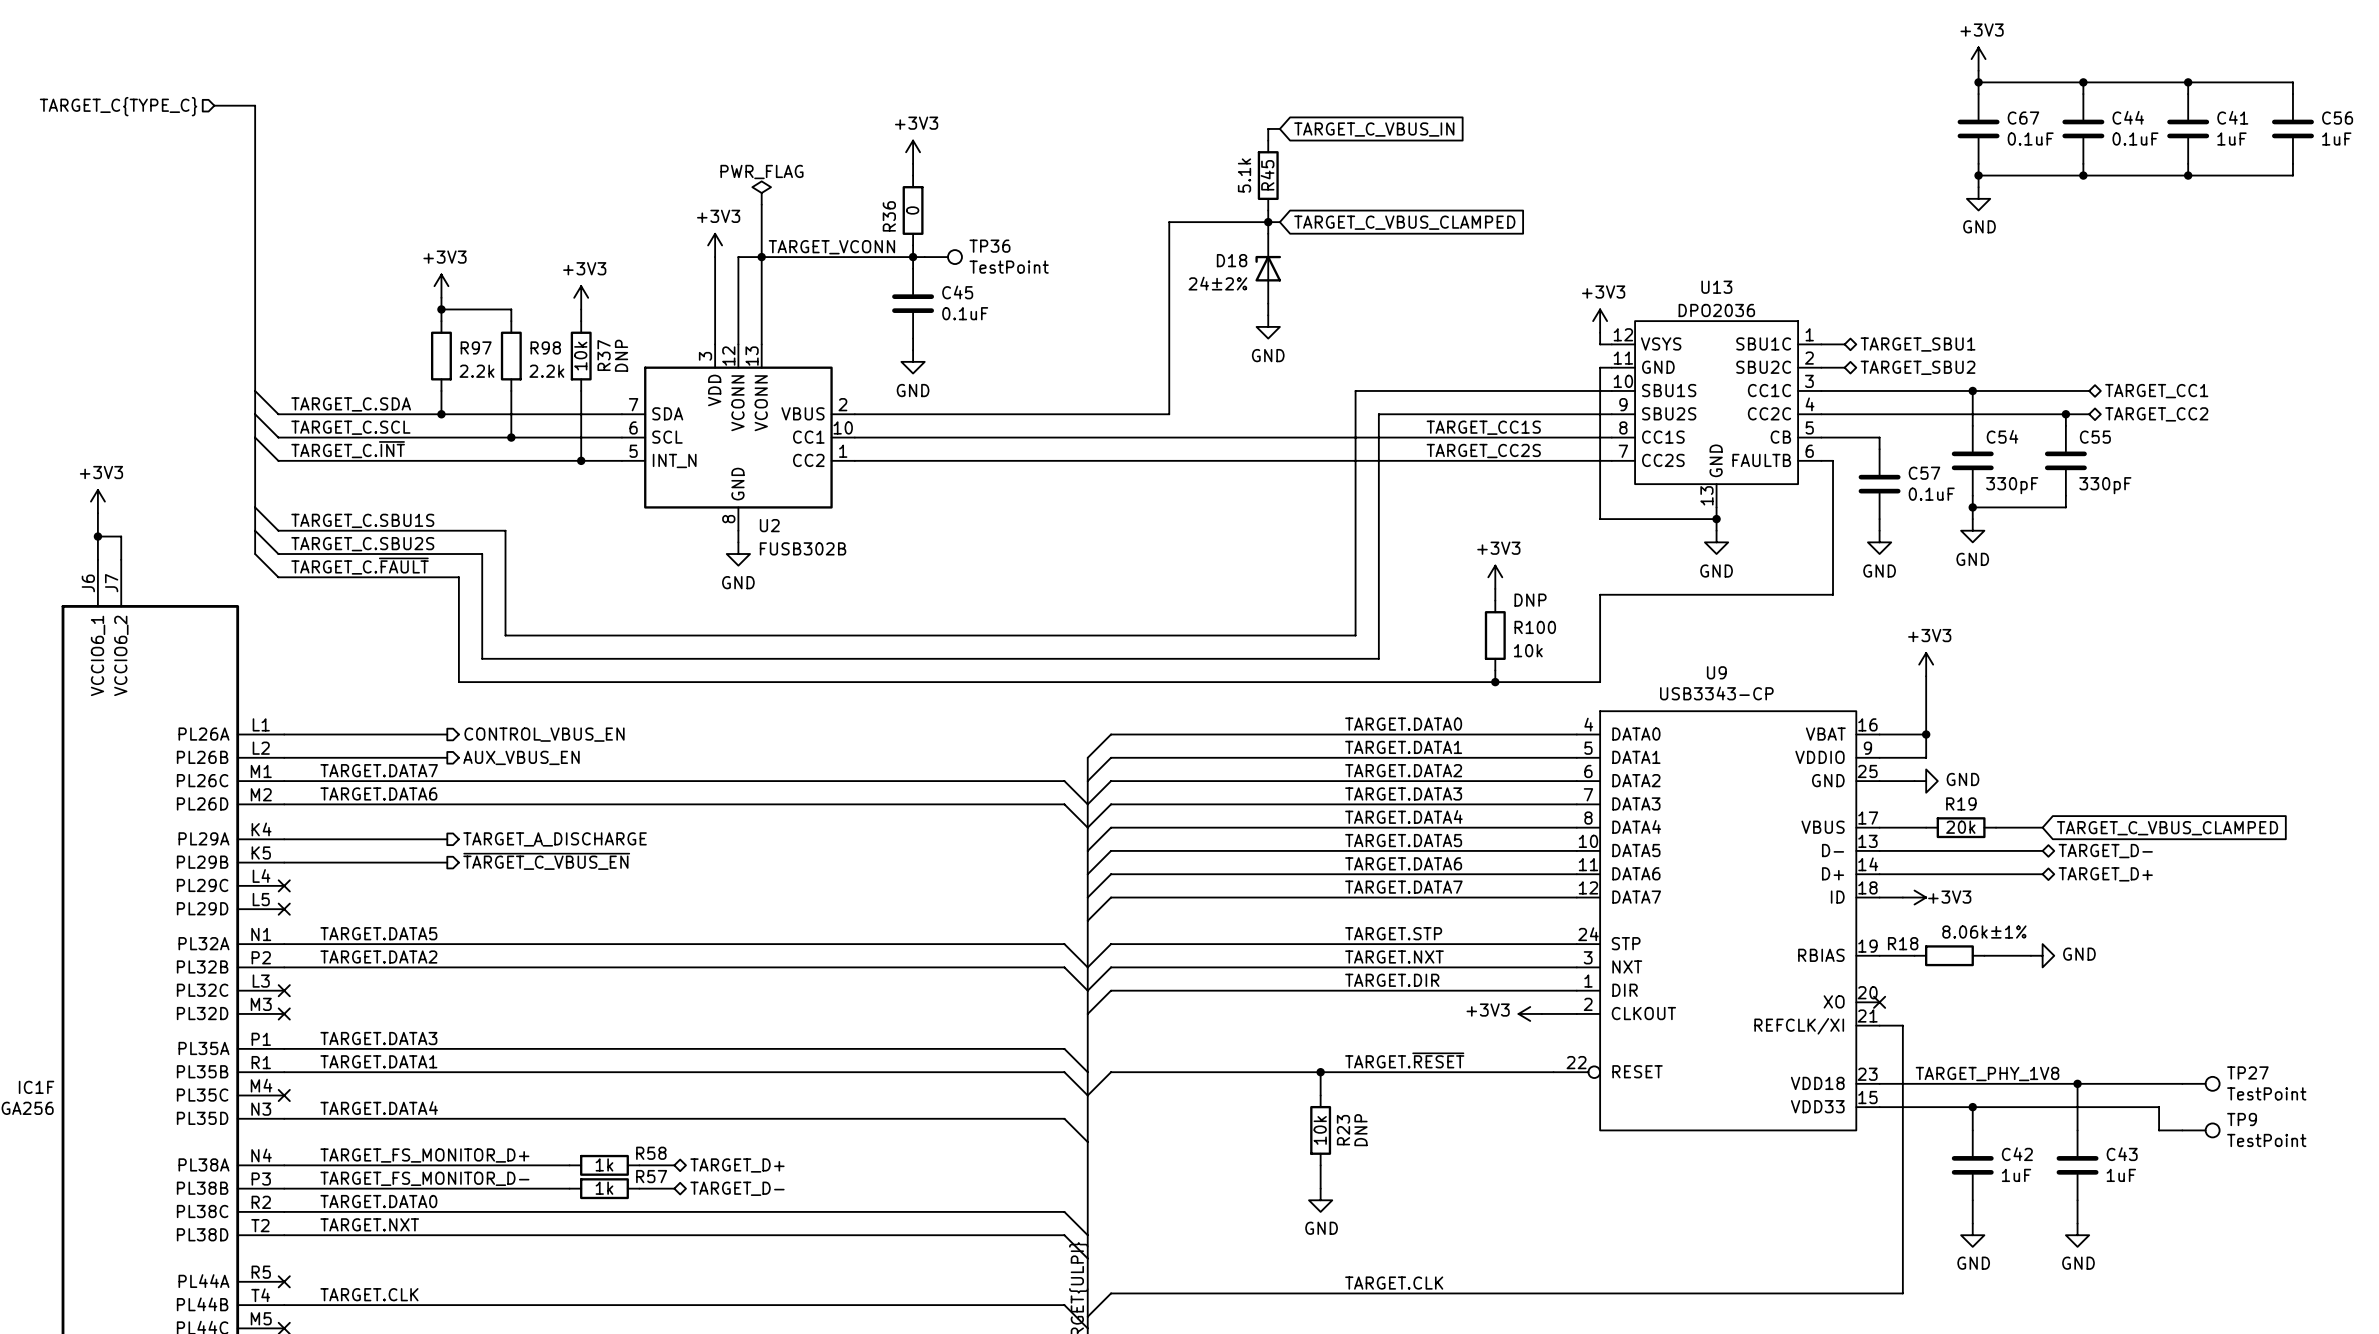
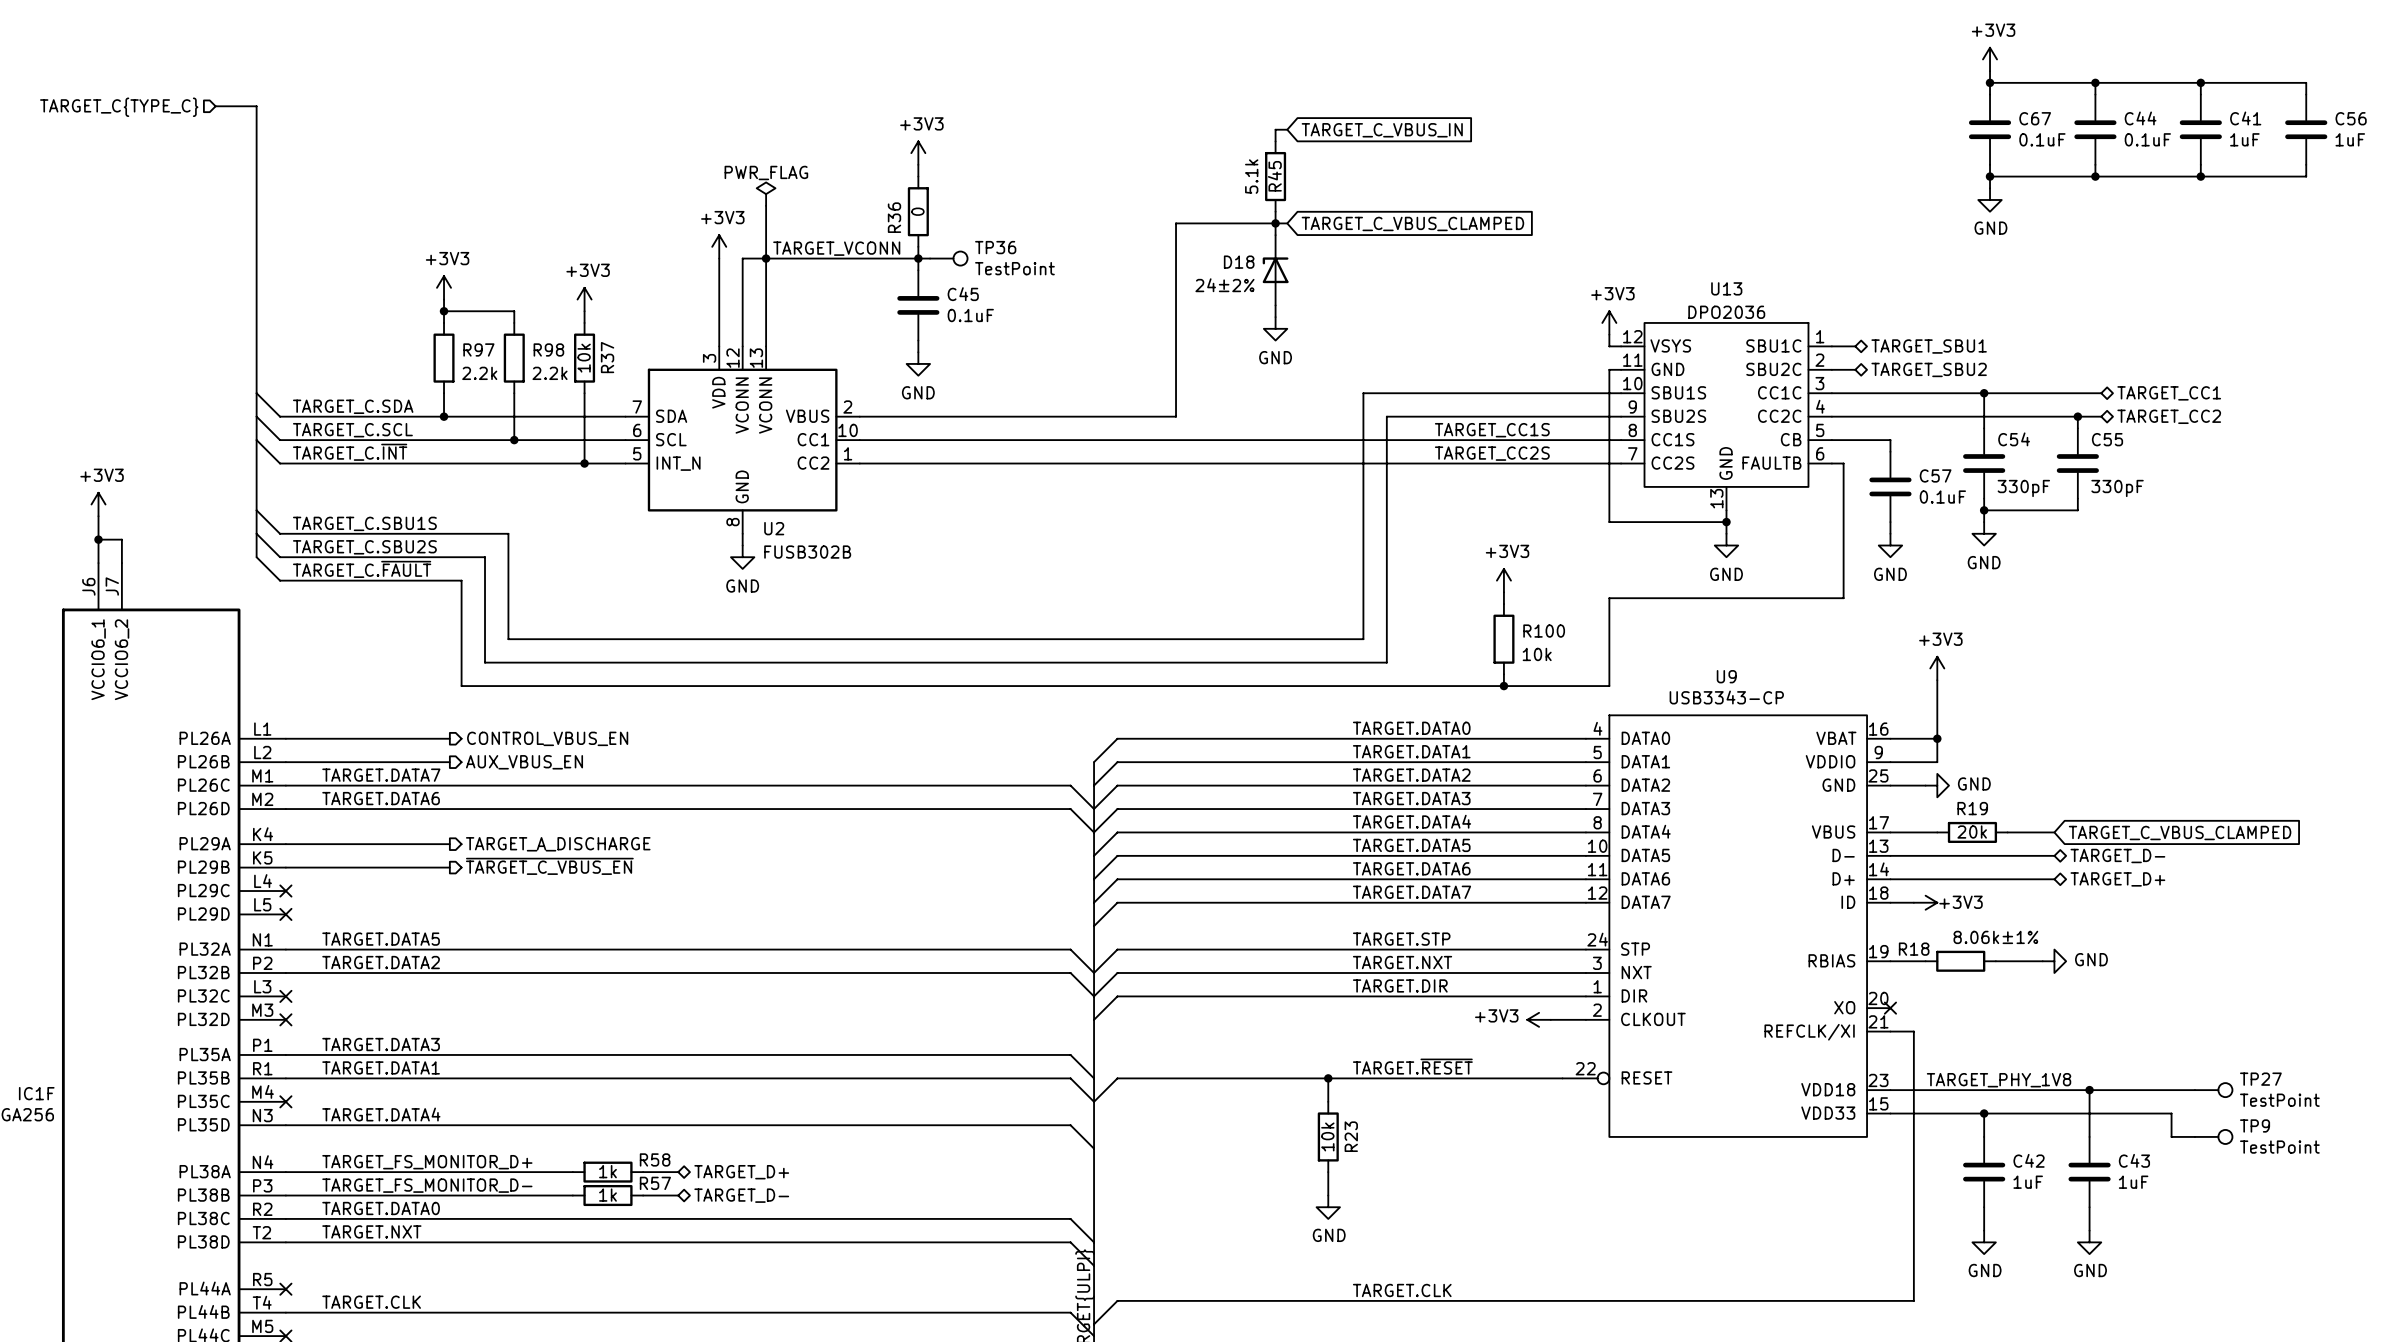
R37 text: DNP (621, 355) -> none
R100 text: DNP (1530, 600) -> none
R23 text: DNP (1360, 1130) -> none

